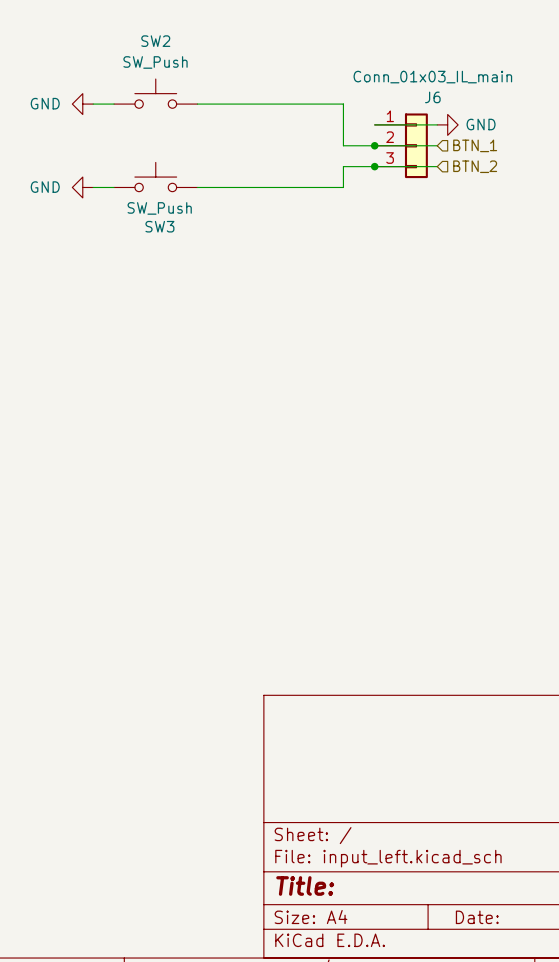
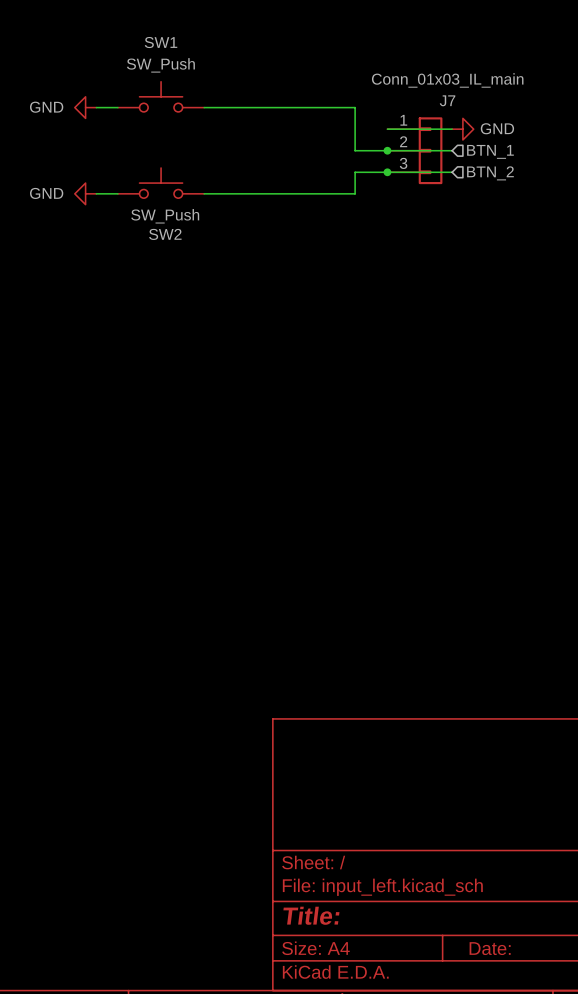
SW2 name: SW2 (155, 41) -> SW1 (161, 42)
J6 name: J6 (432, 97) -> J7 (447, 100)
SW3 name: SW3 (159, 226) -> SW2 (165, 234)

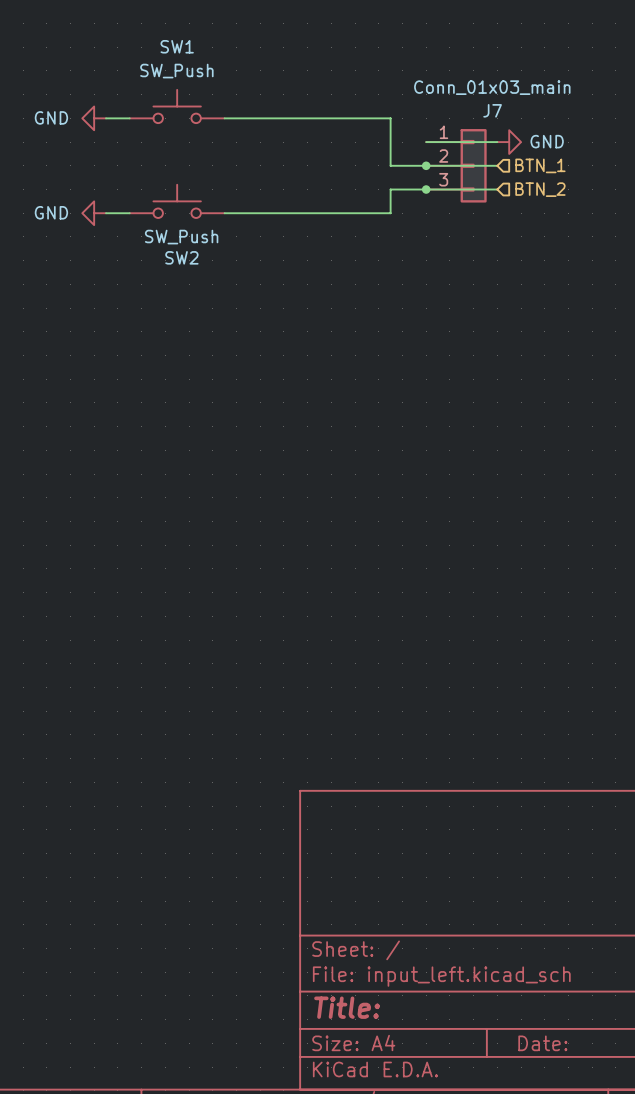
J7 value: Conn_01x03_IL_main (447, 80) -> Conn_01x03_main (492, 87)

